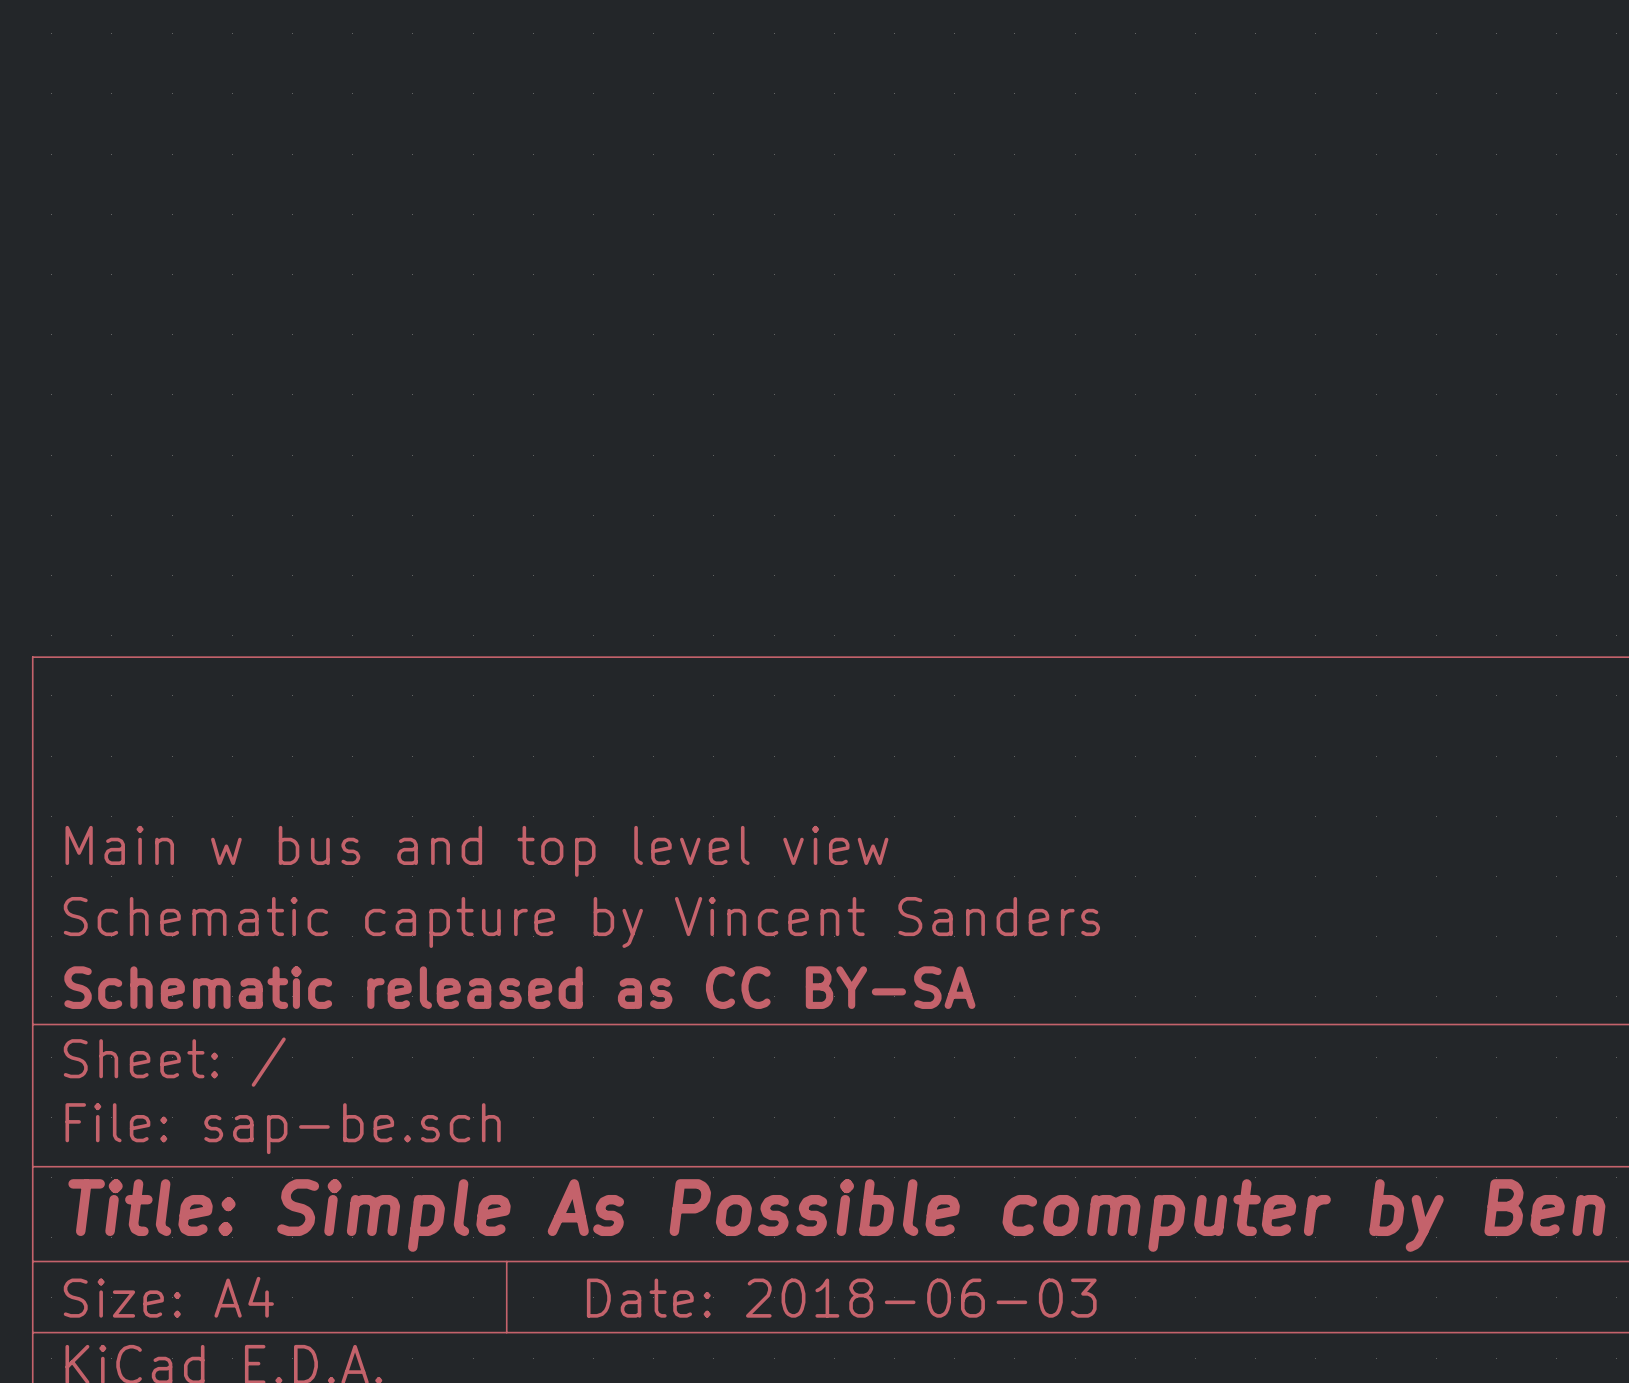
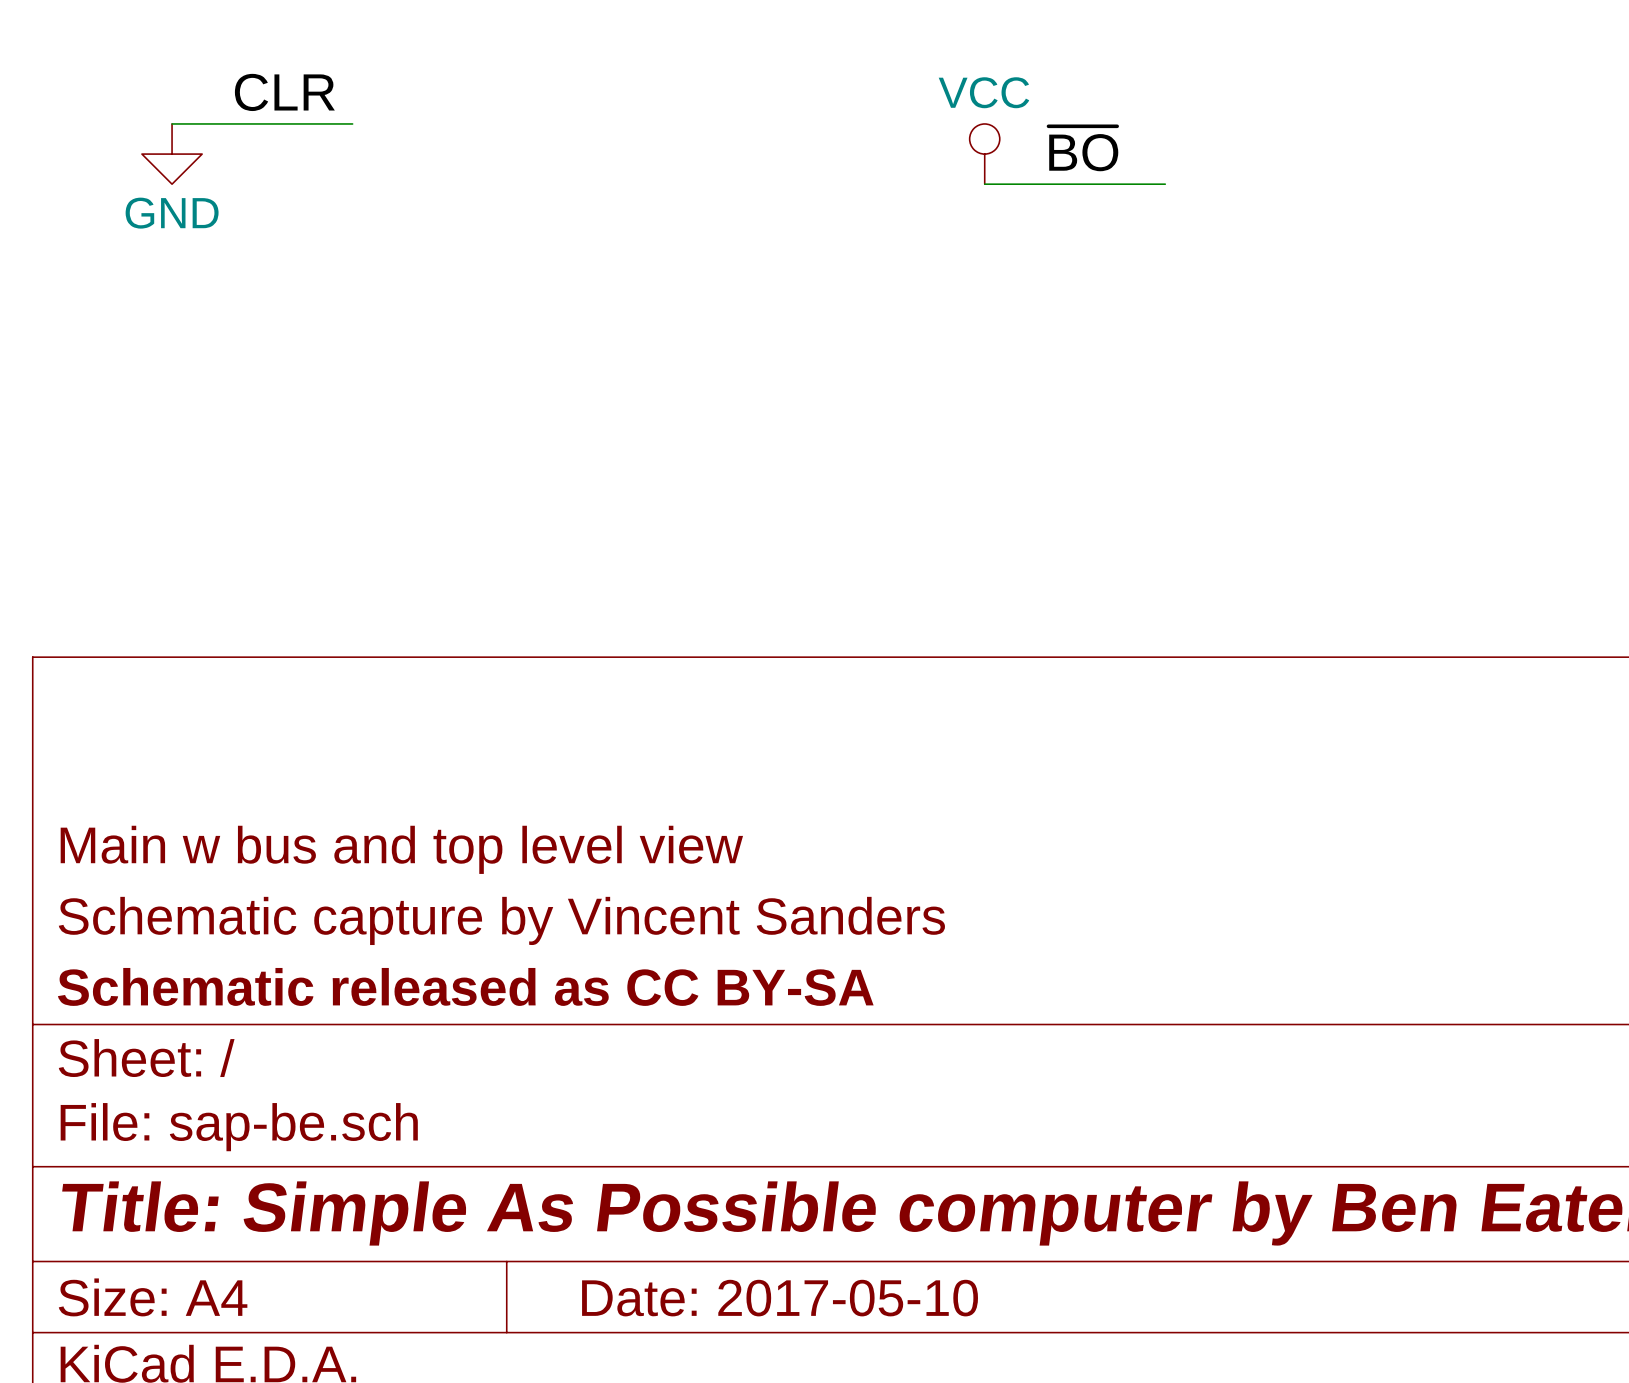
label: none -> CLR (284, 92)
wire: none -> (172, 123) (352, 123)
label: none -> ~{BO} (1083, 148)
power symbol: none -> GND (172, 154)
power symbol: none -> VCC (984, 154)
wire: none -> (984, 184) (1165, 184)
title block: Date: 2018-06-03 (841, 1298) -> Date: 2017-05-10 (780, 1298)

